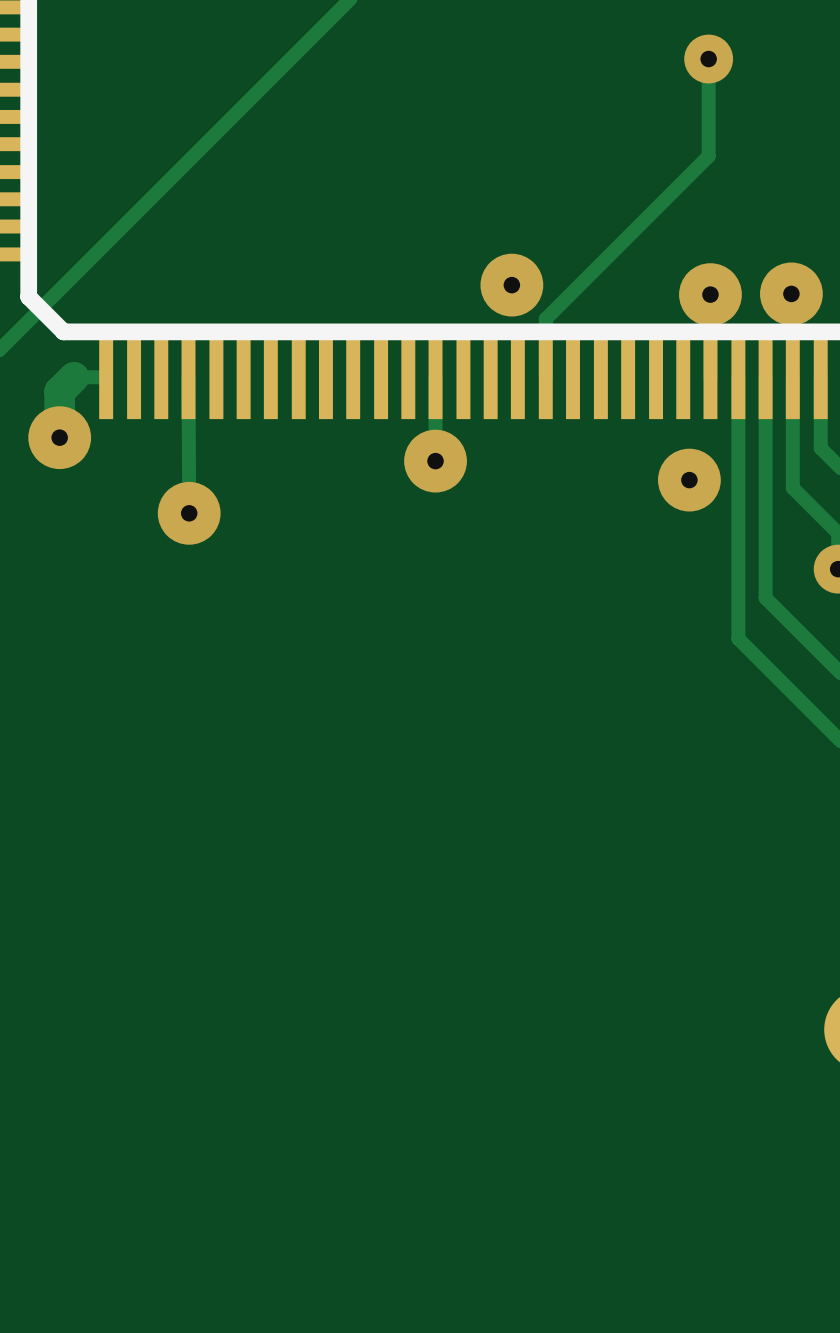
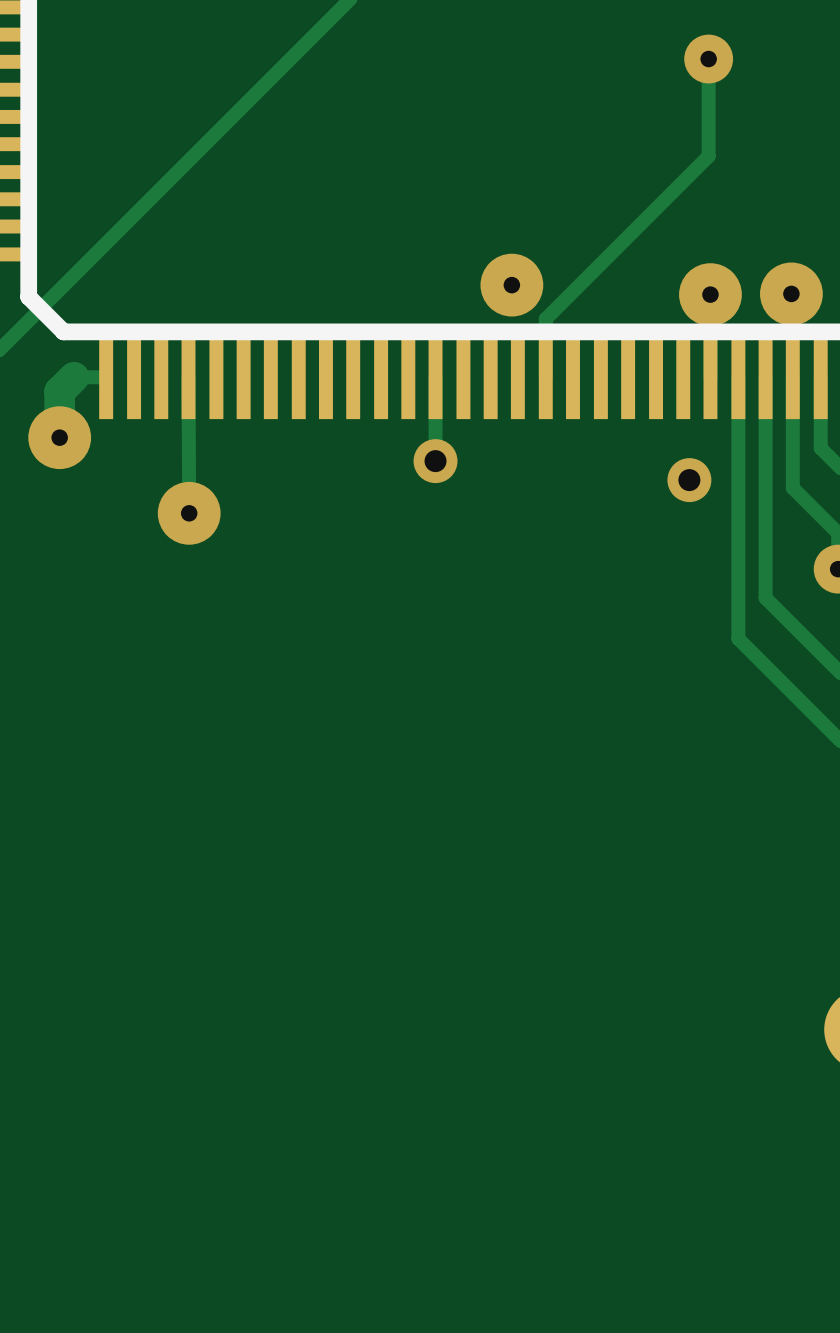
via size: [404, 429, 467, 493] -> [413, 439, 458, 484]
via size: [657, 448, 721, 512] -> [667, 458, 712, 503]

